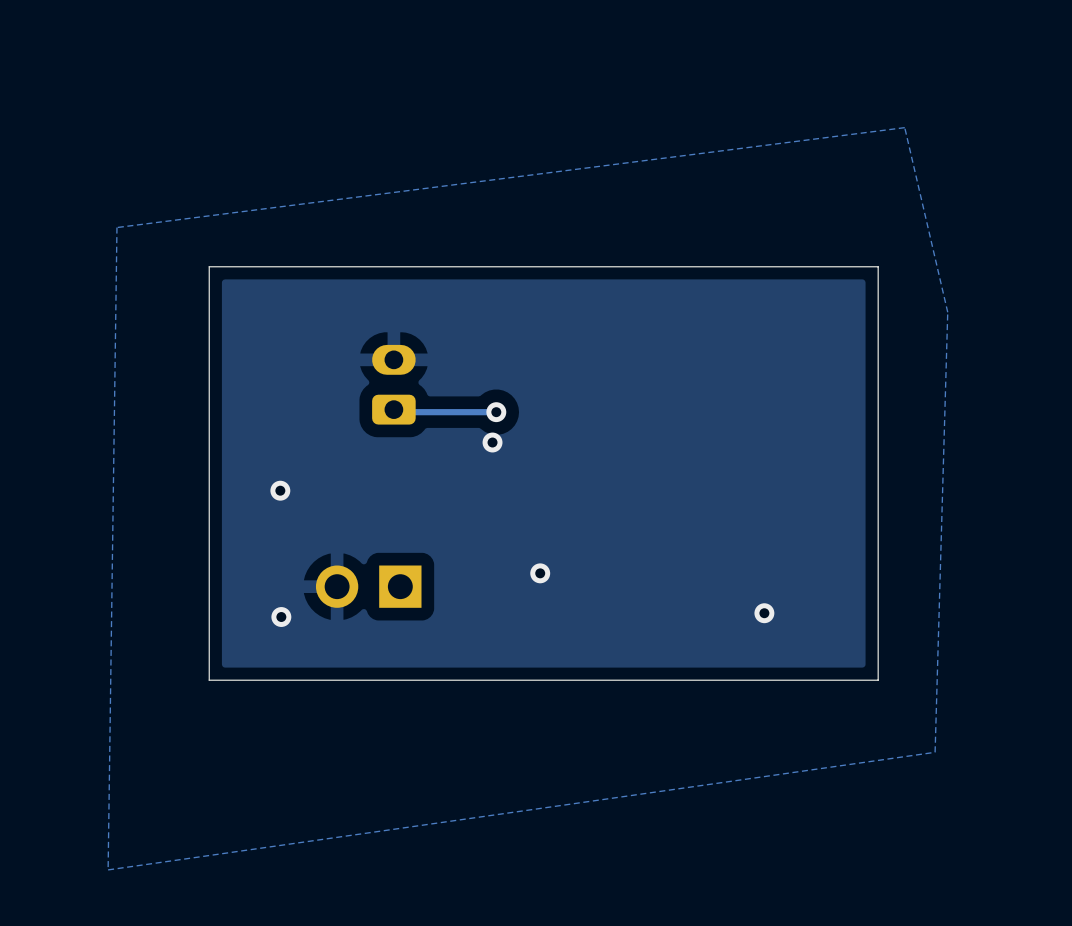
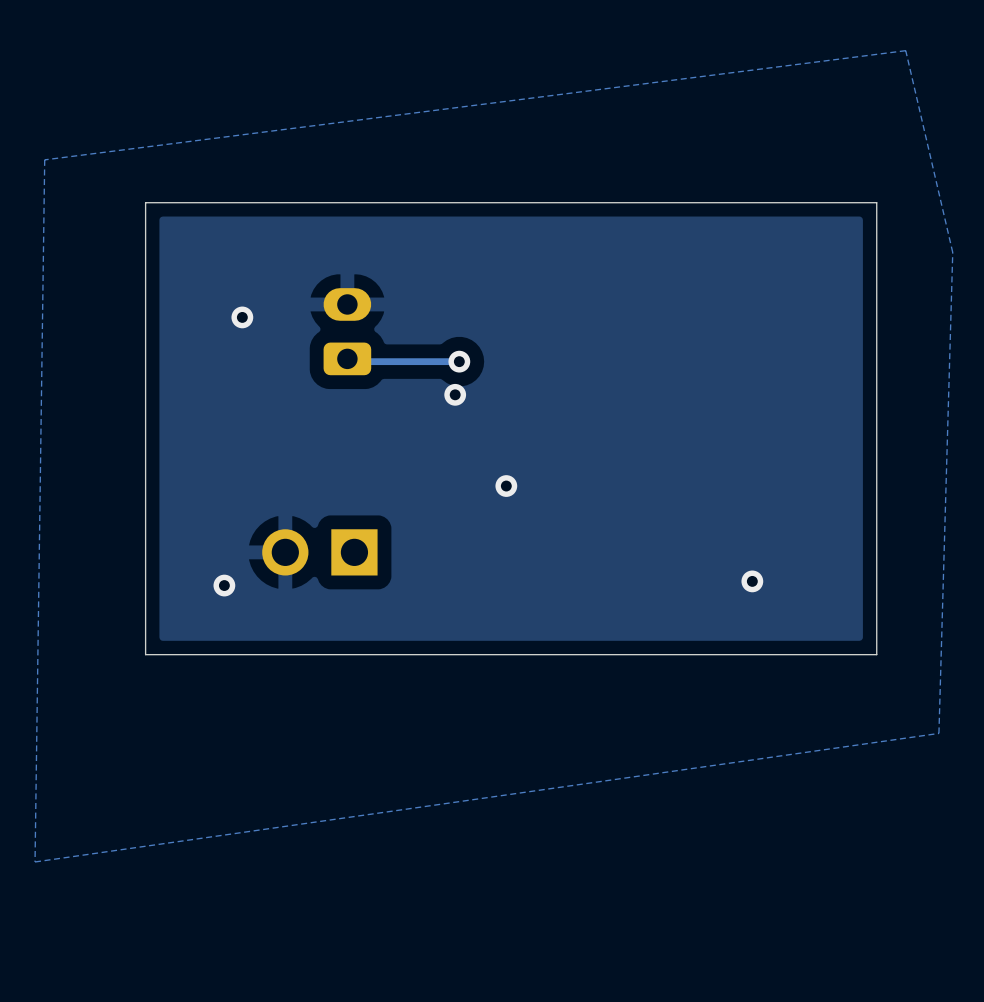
via position: (280, 490) -> (242, 317)
via position: (540, 573) -> (506, 486)

